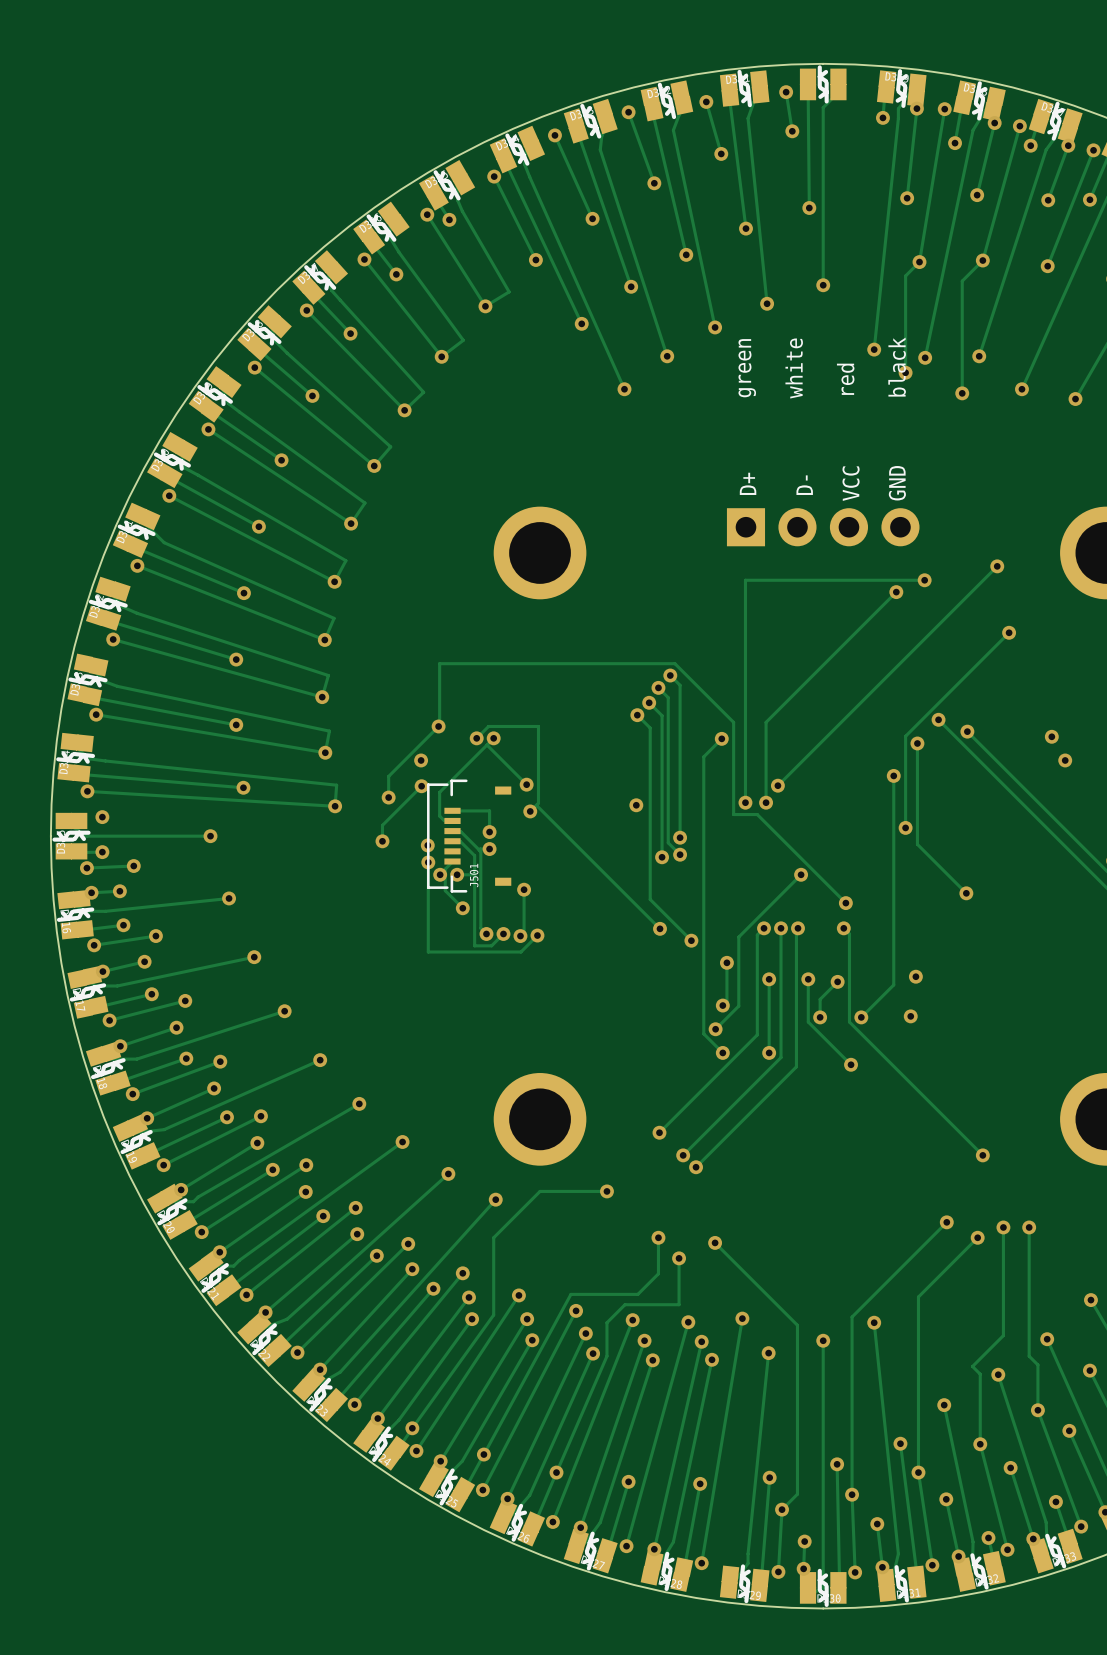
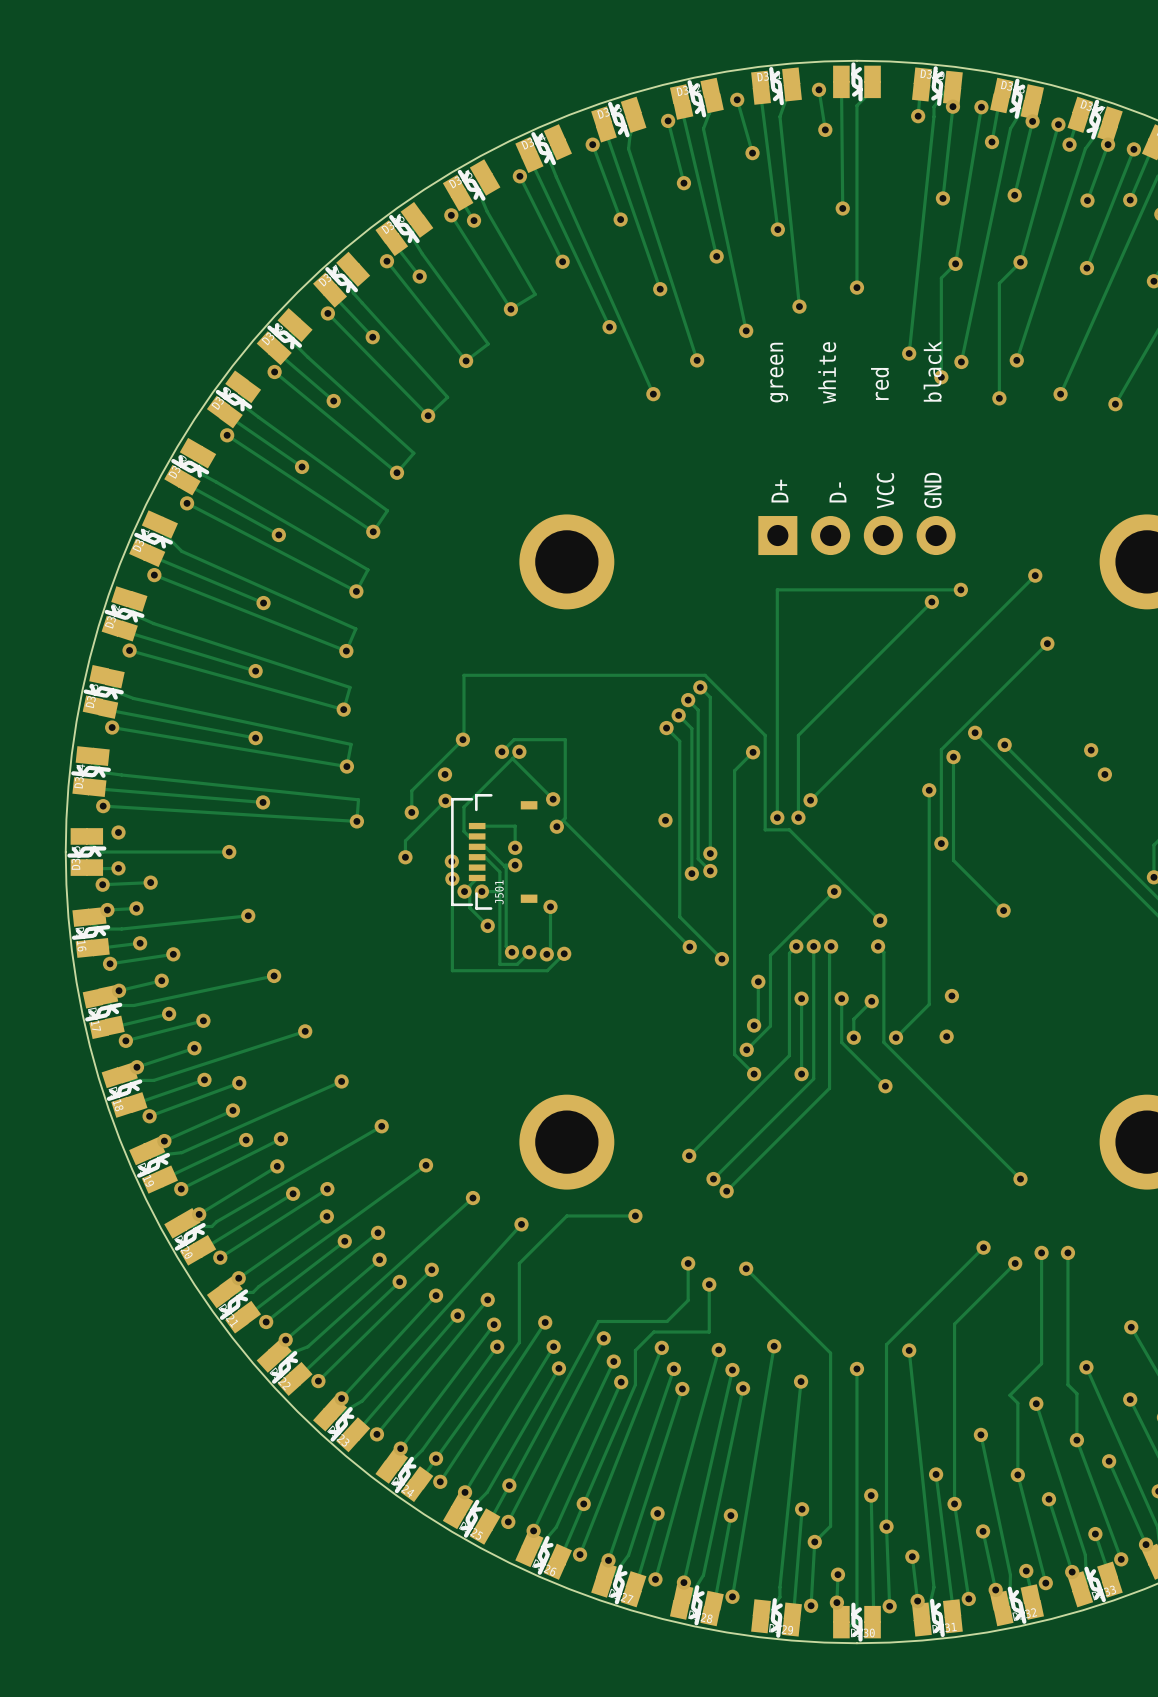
track: (628, 112) (654, 183) -> (668, 120) (683, 183)
via position: (628, 112) -> (668, 120)
track: (554, 135) (592, 218) -> (592, 144) (620, 219)
via position: (554, 135) -> (592, 144)

